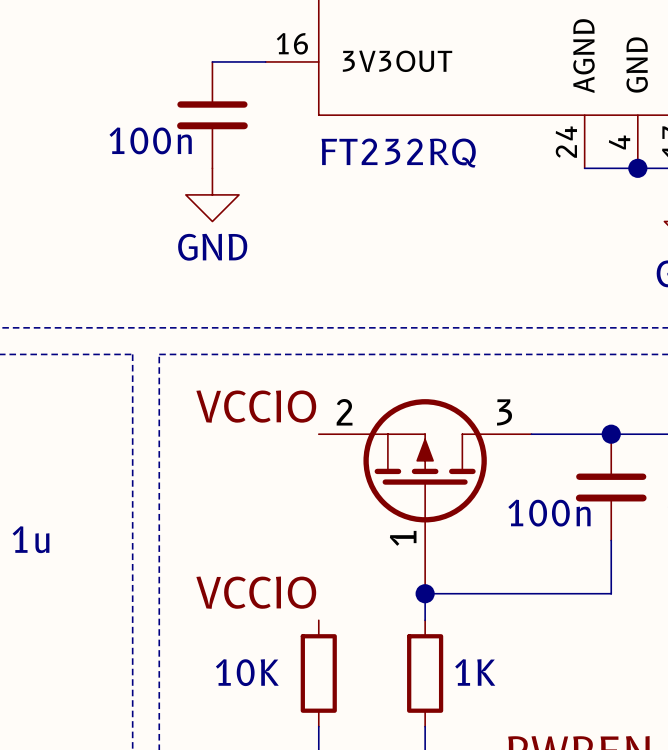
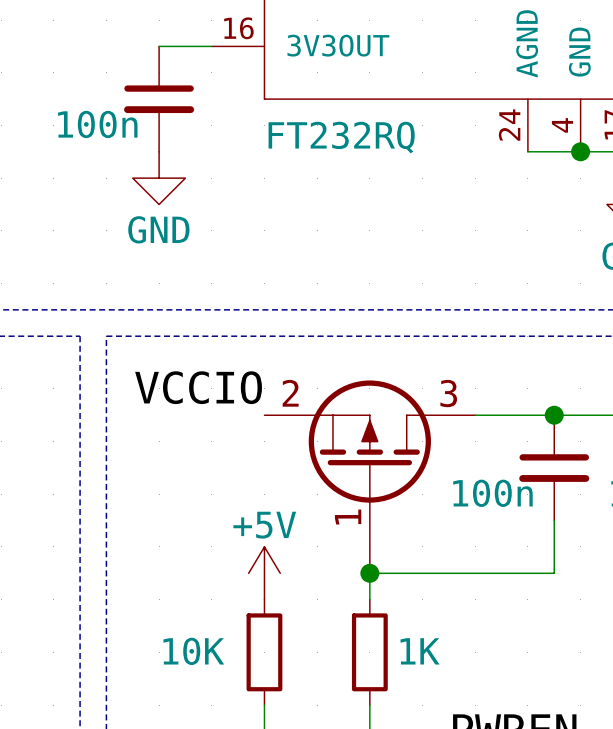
label: VCCIO (256, 592) -> none
power symbol: none -> +5V (264, 573)

